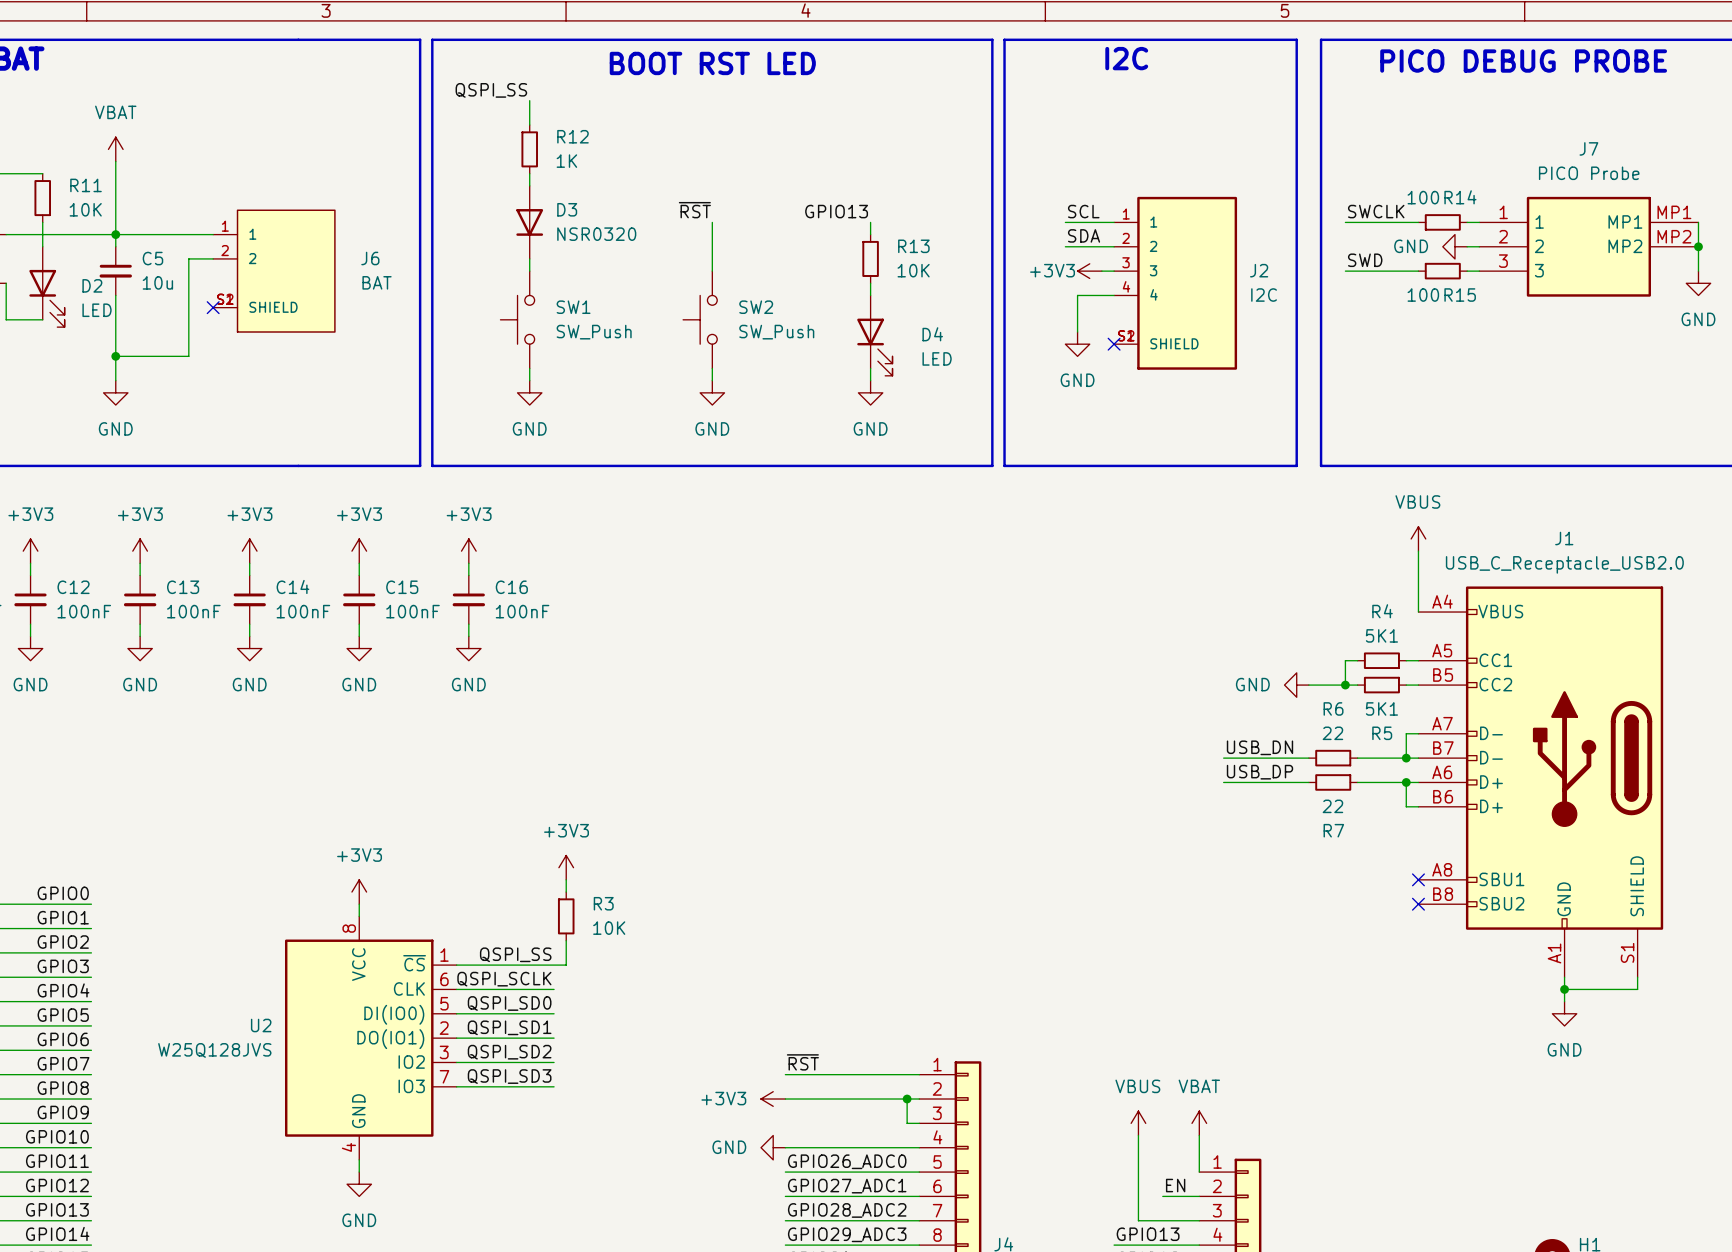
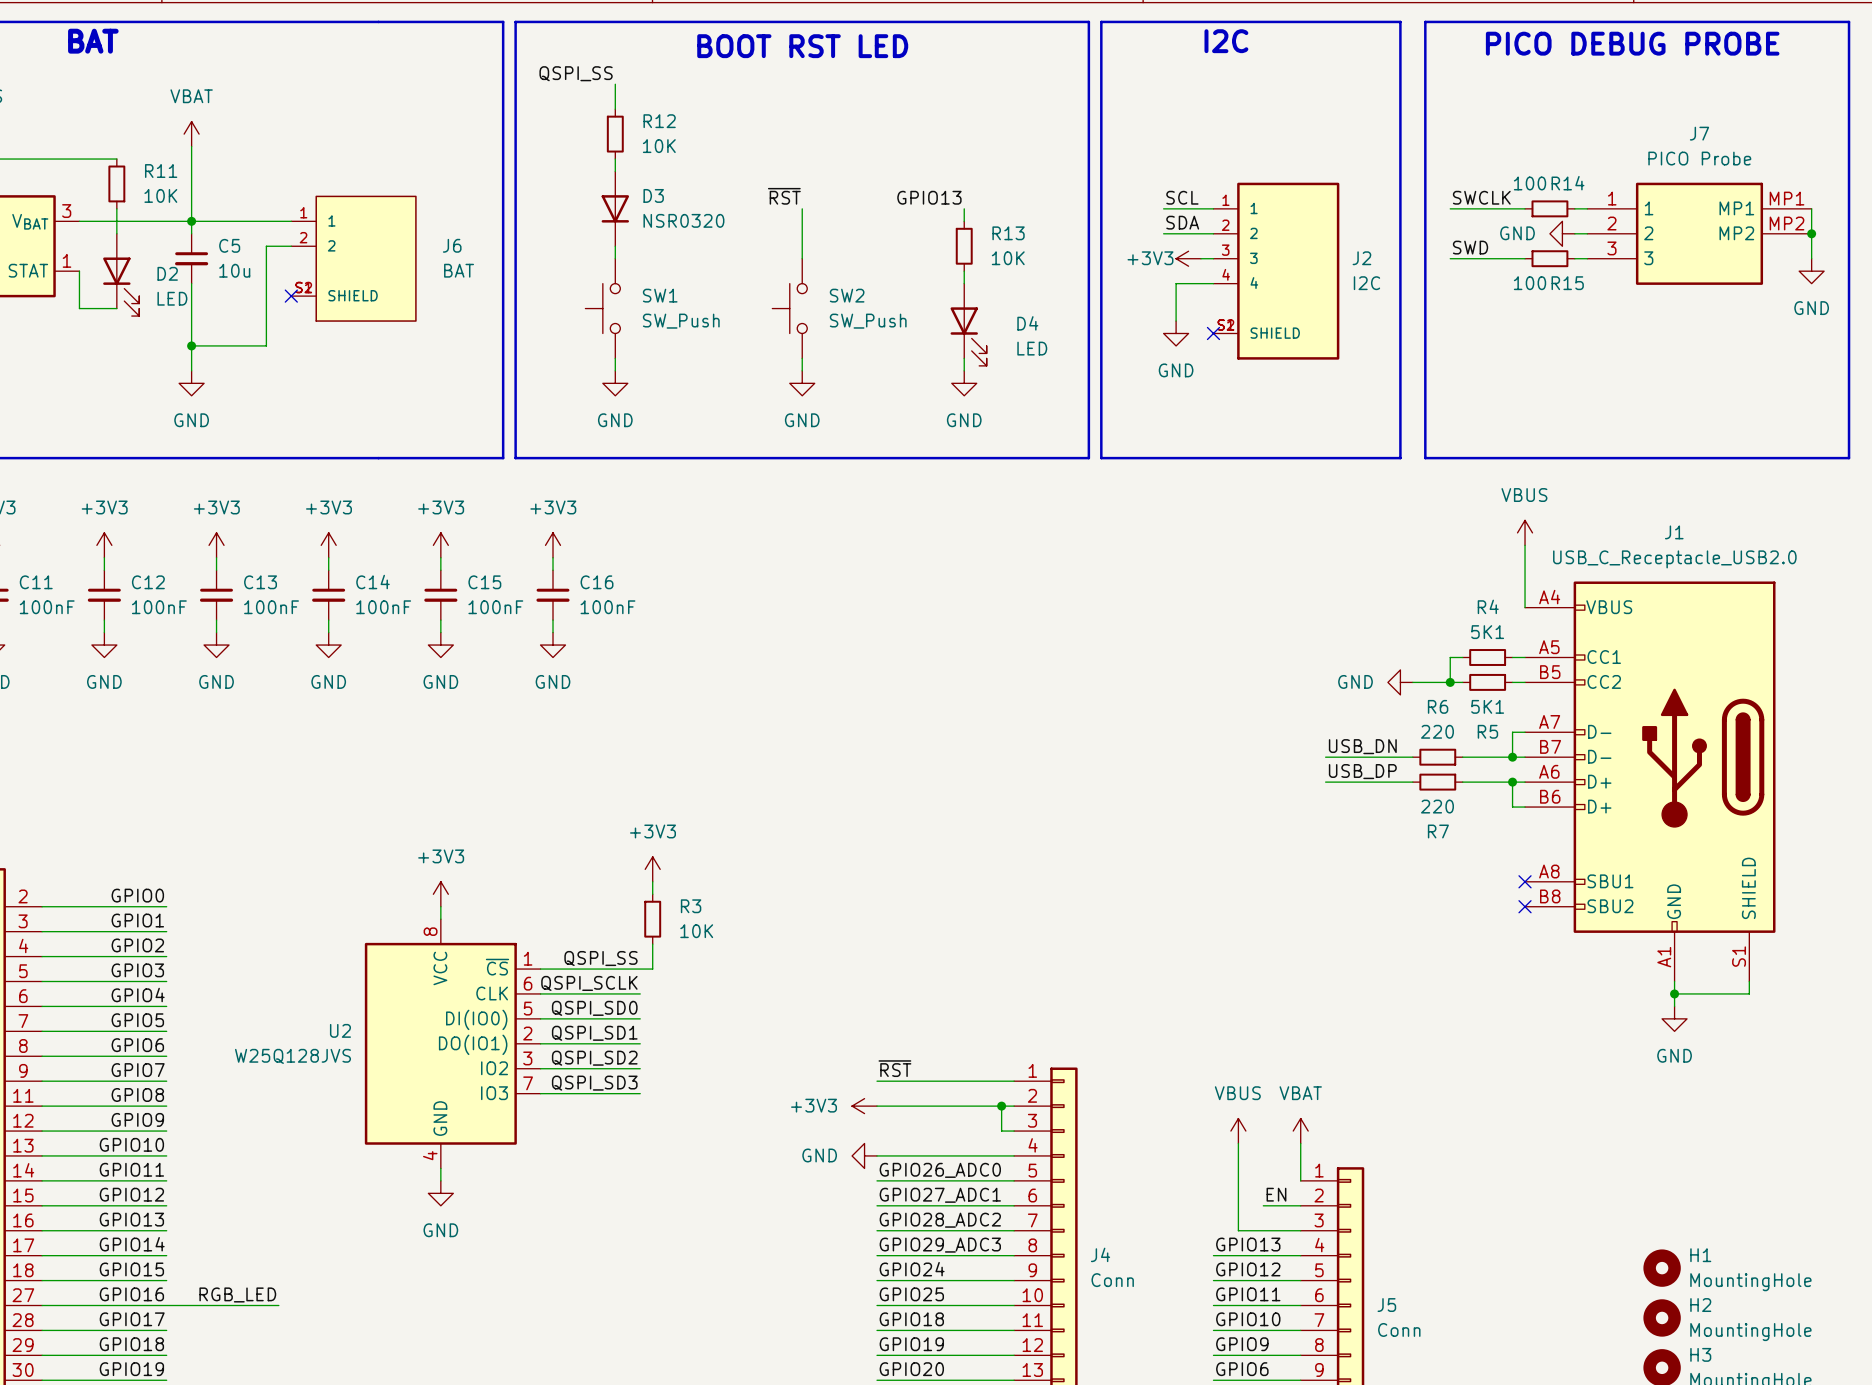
R12 value: 1K (566, 161) -> 10K (659, 146)
R6 value: 22 (1332, 733) -> 220 (1437, 731)
R7 value: 22 (1332, 806) -> 220 (1437, 806)

